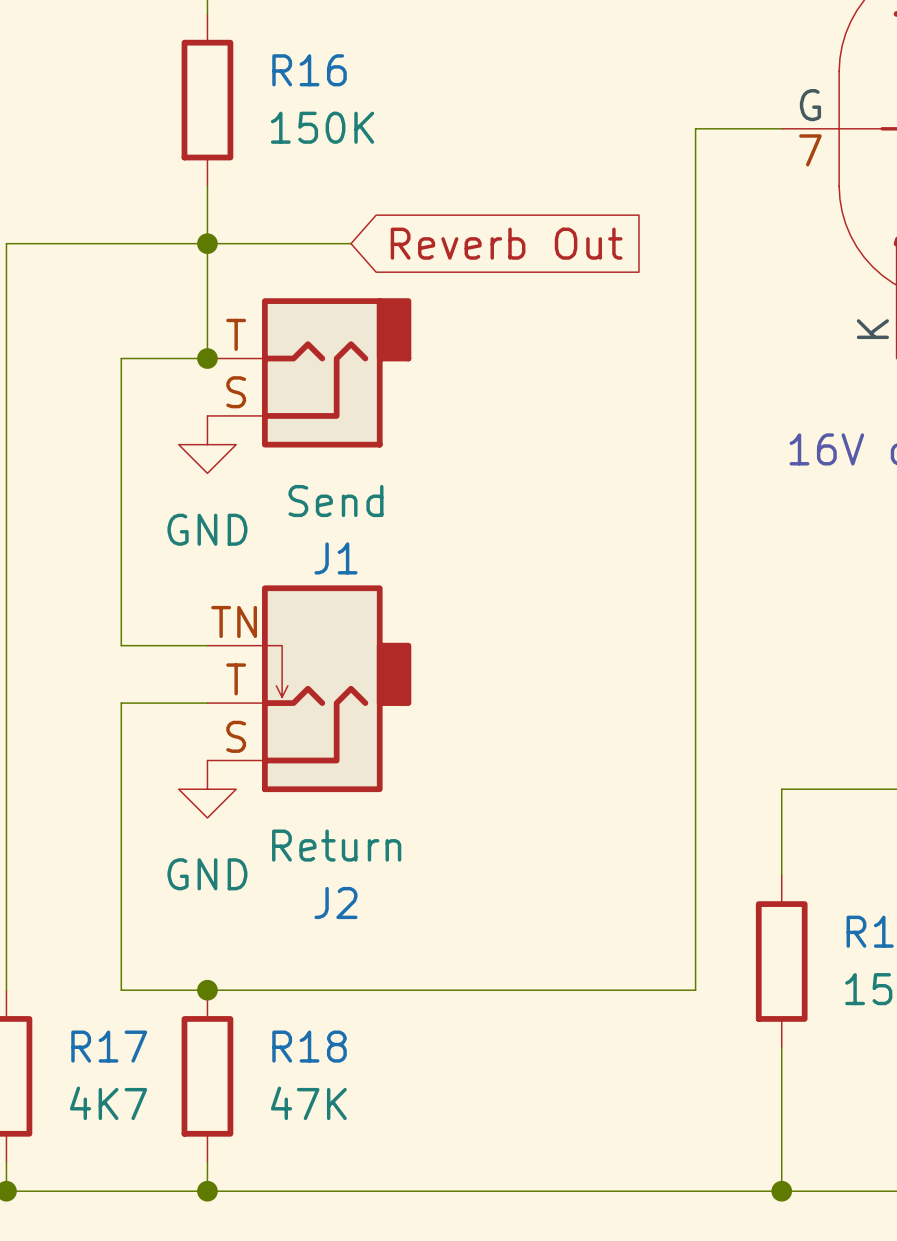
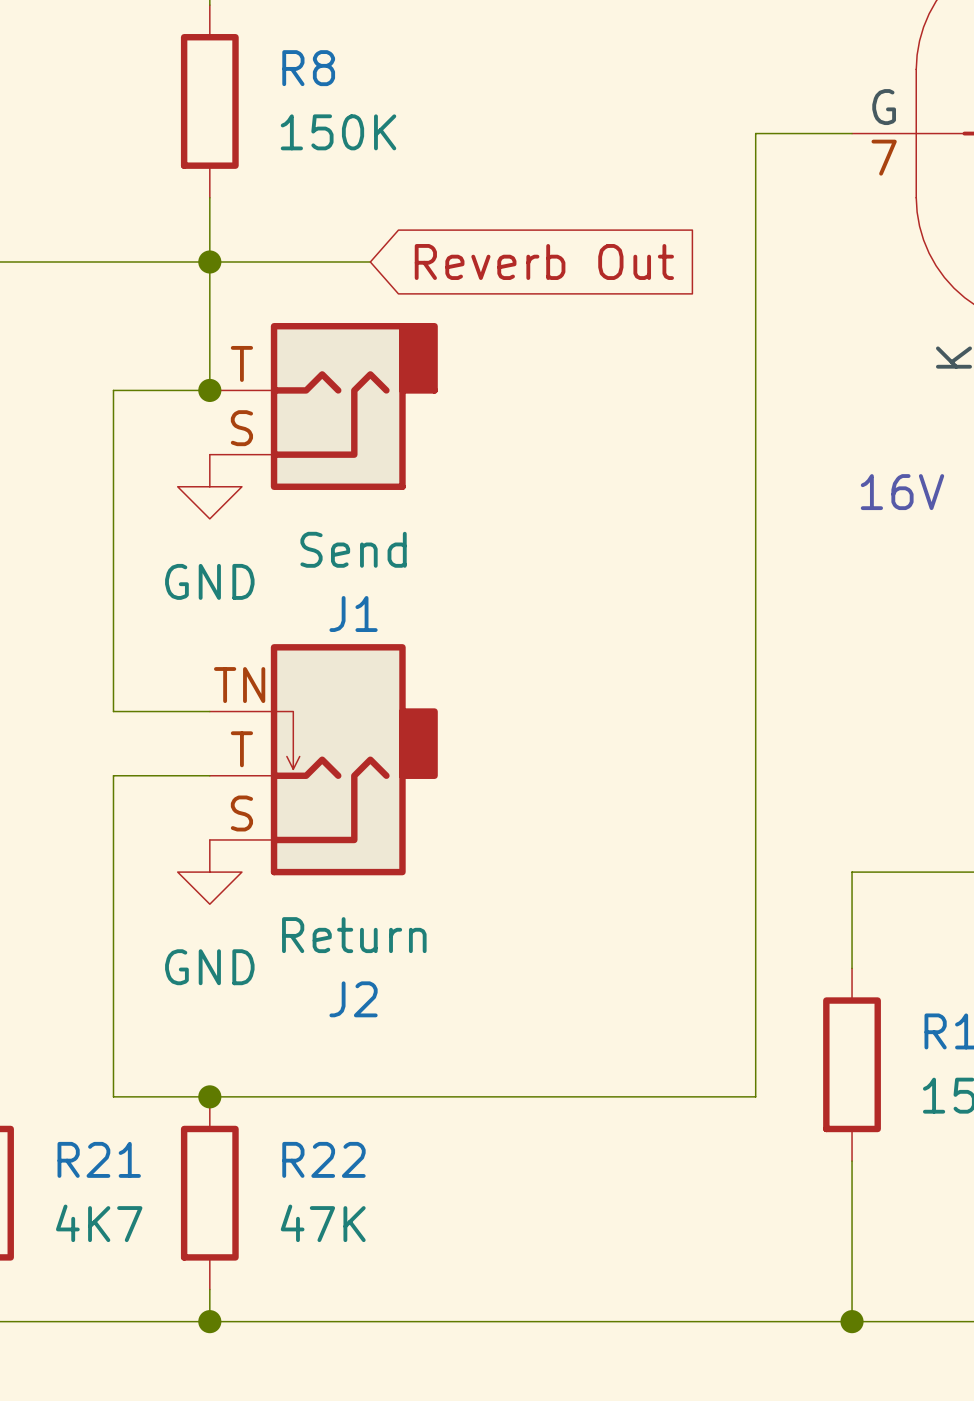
R16 name: R16 (309, 70) -> R8 (308, 68)
R17 name: R17 (109, 1046) -> R21 (99, 1159)
R18 name: R18 (309, 1046) -> R22 (323, 1159)

